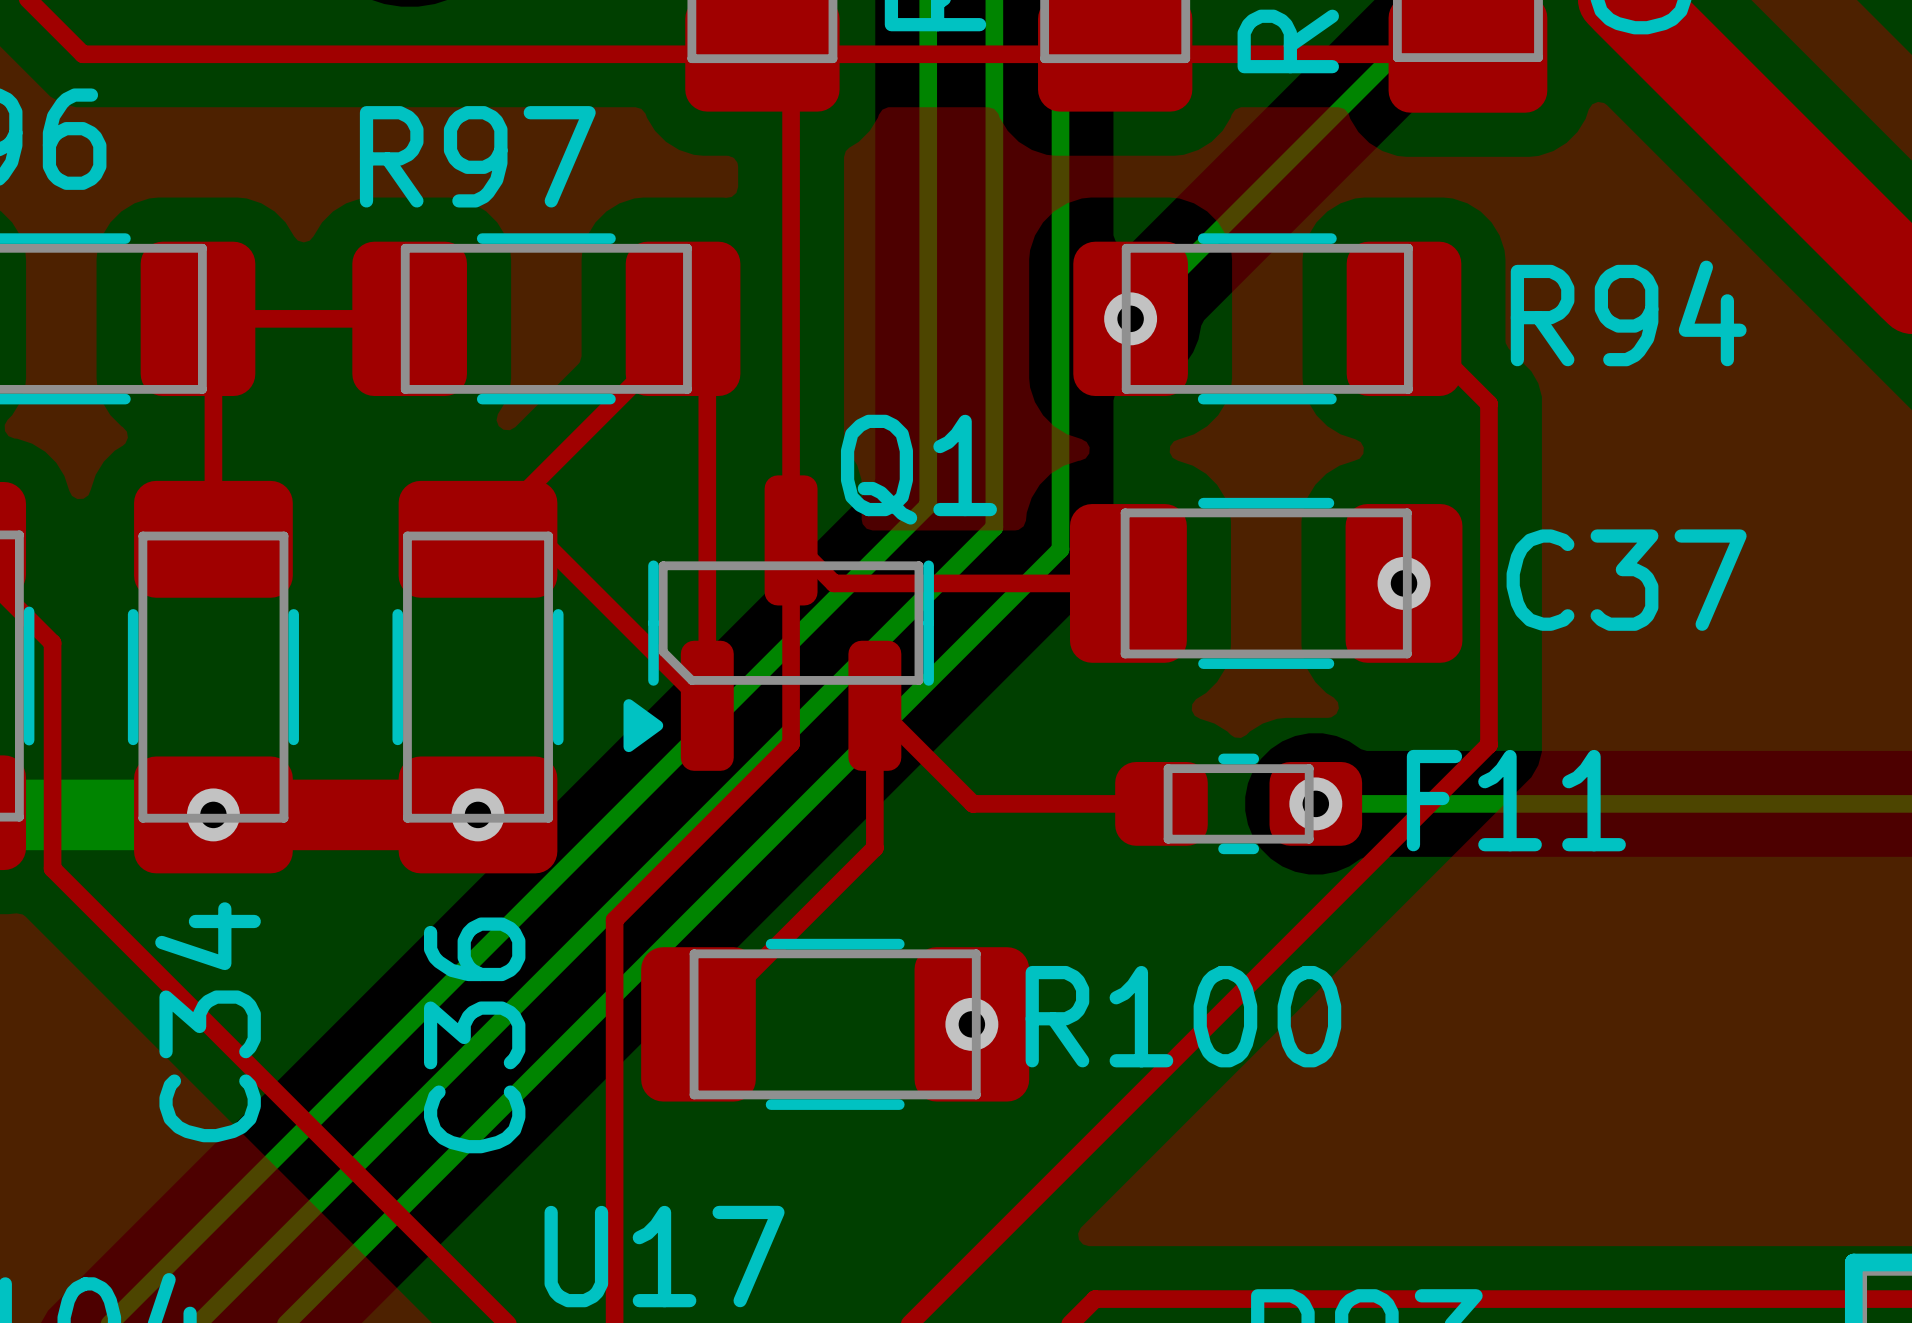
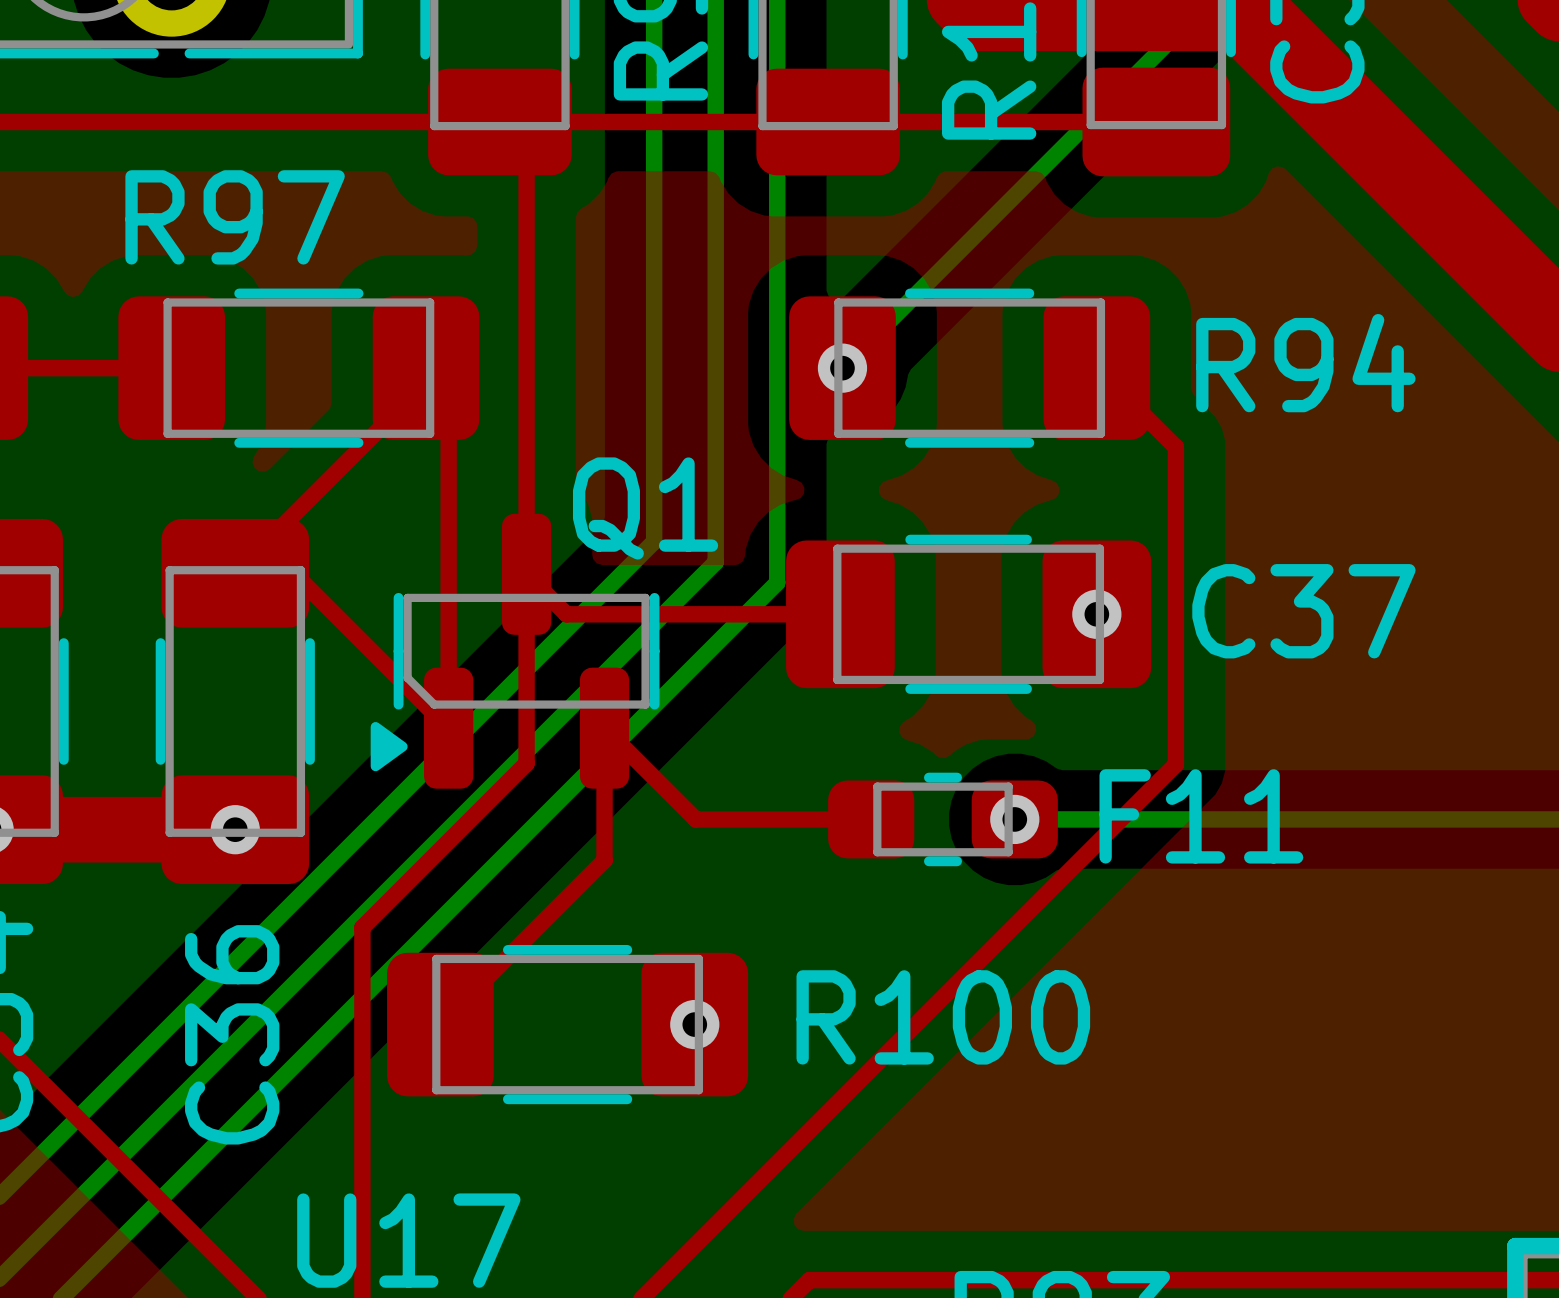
R100 name position: R100 (1183, 1016) -> R100 (943, 1017)

